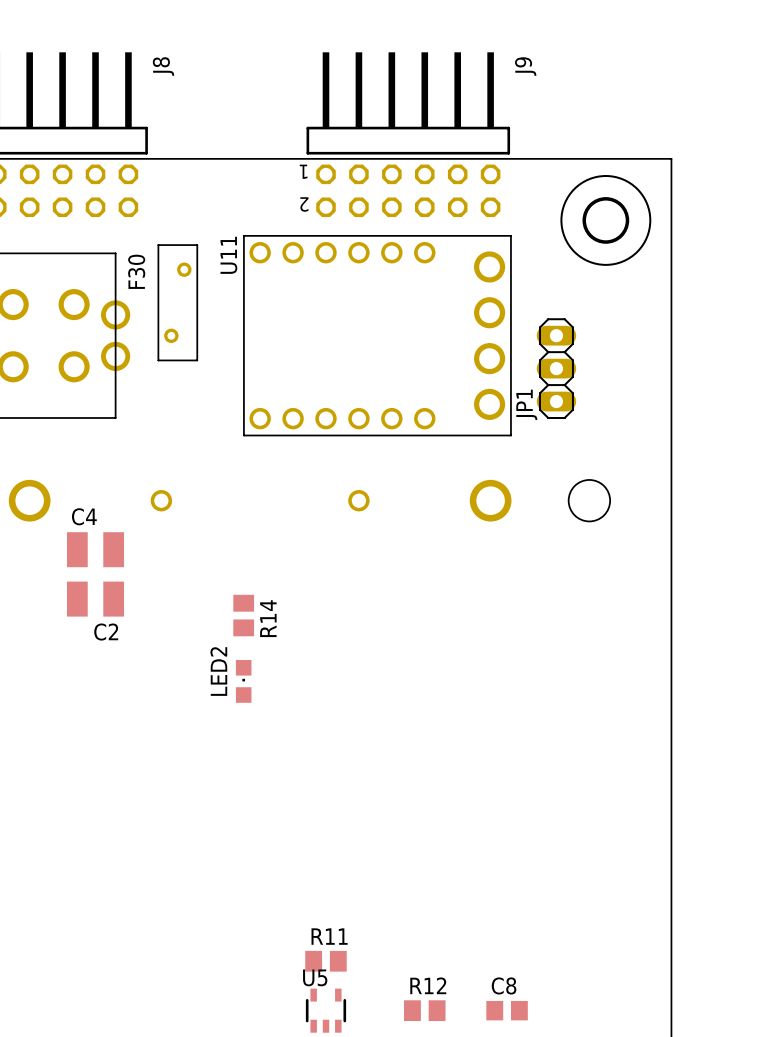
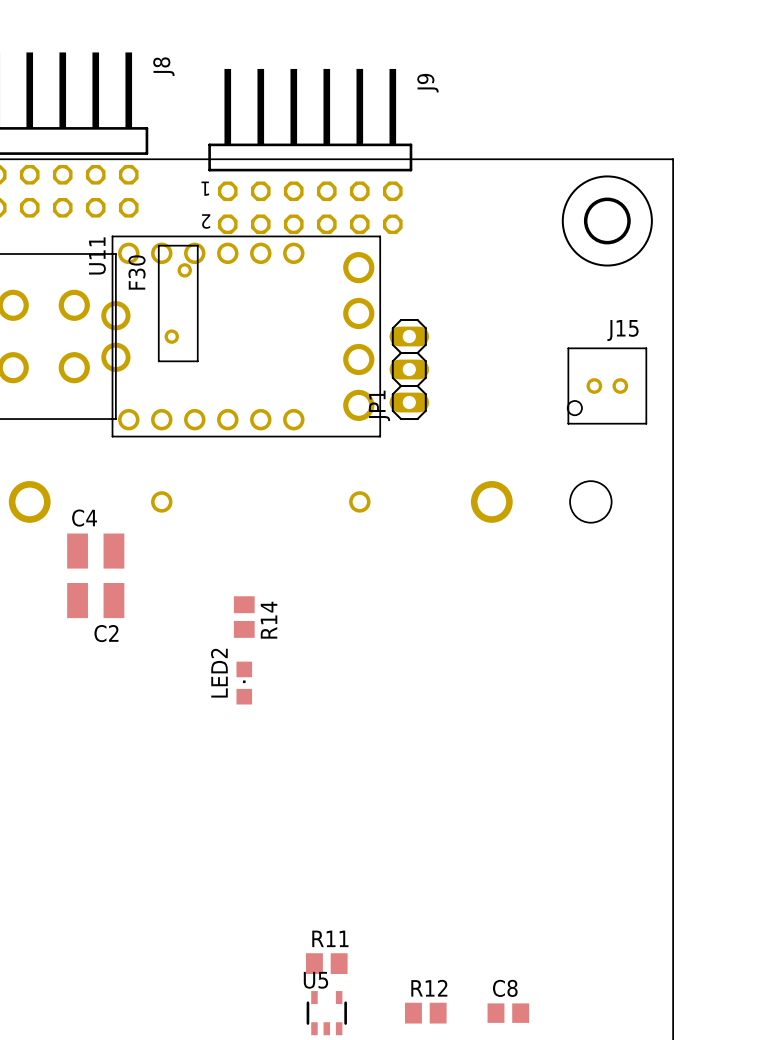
J9 position: (408, 134) -> (310, 151)
U11 position: (377, 335) -> (246, 336)
JP1 position: (556, 368) -> (409, 369)
J15: none -> (607, 386)

